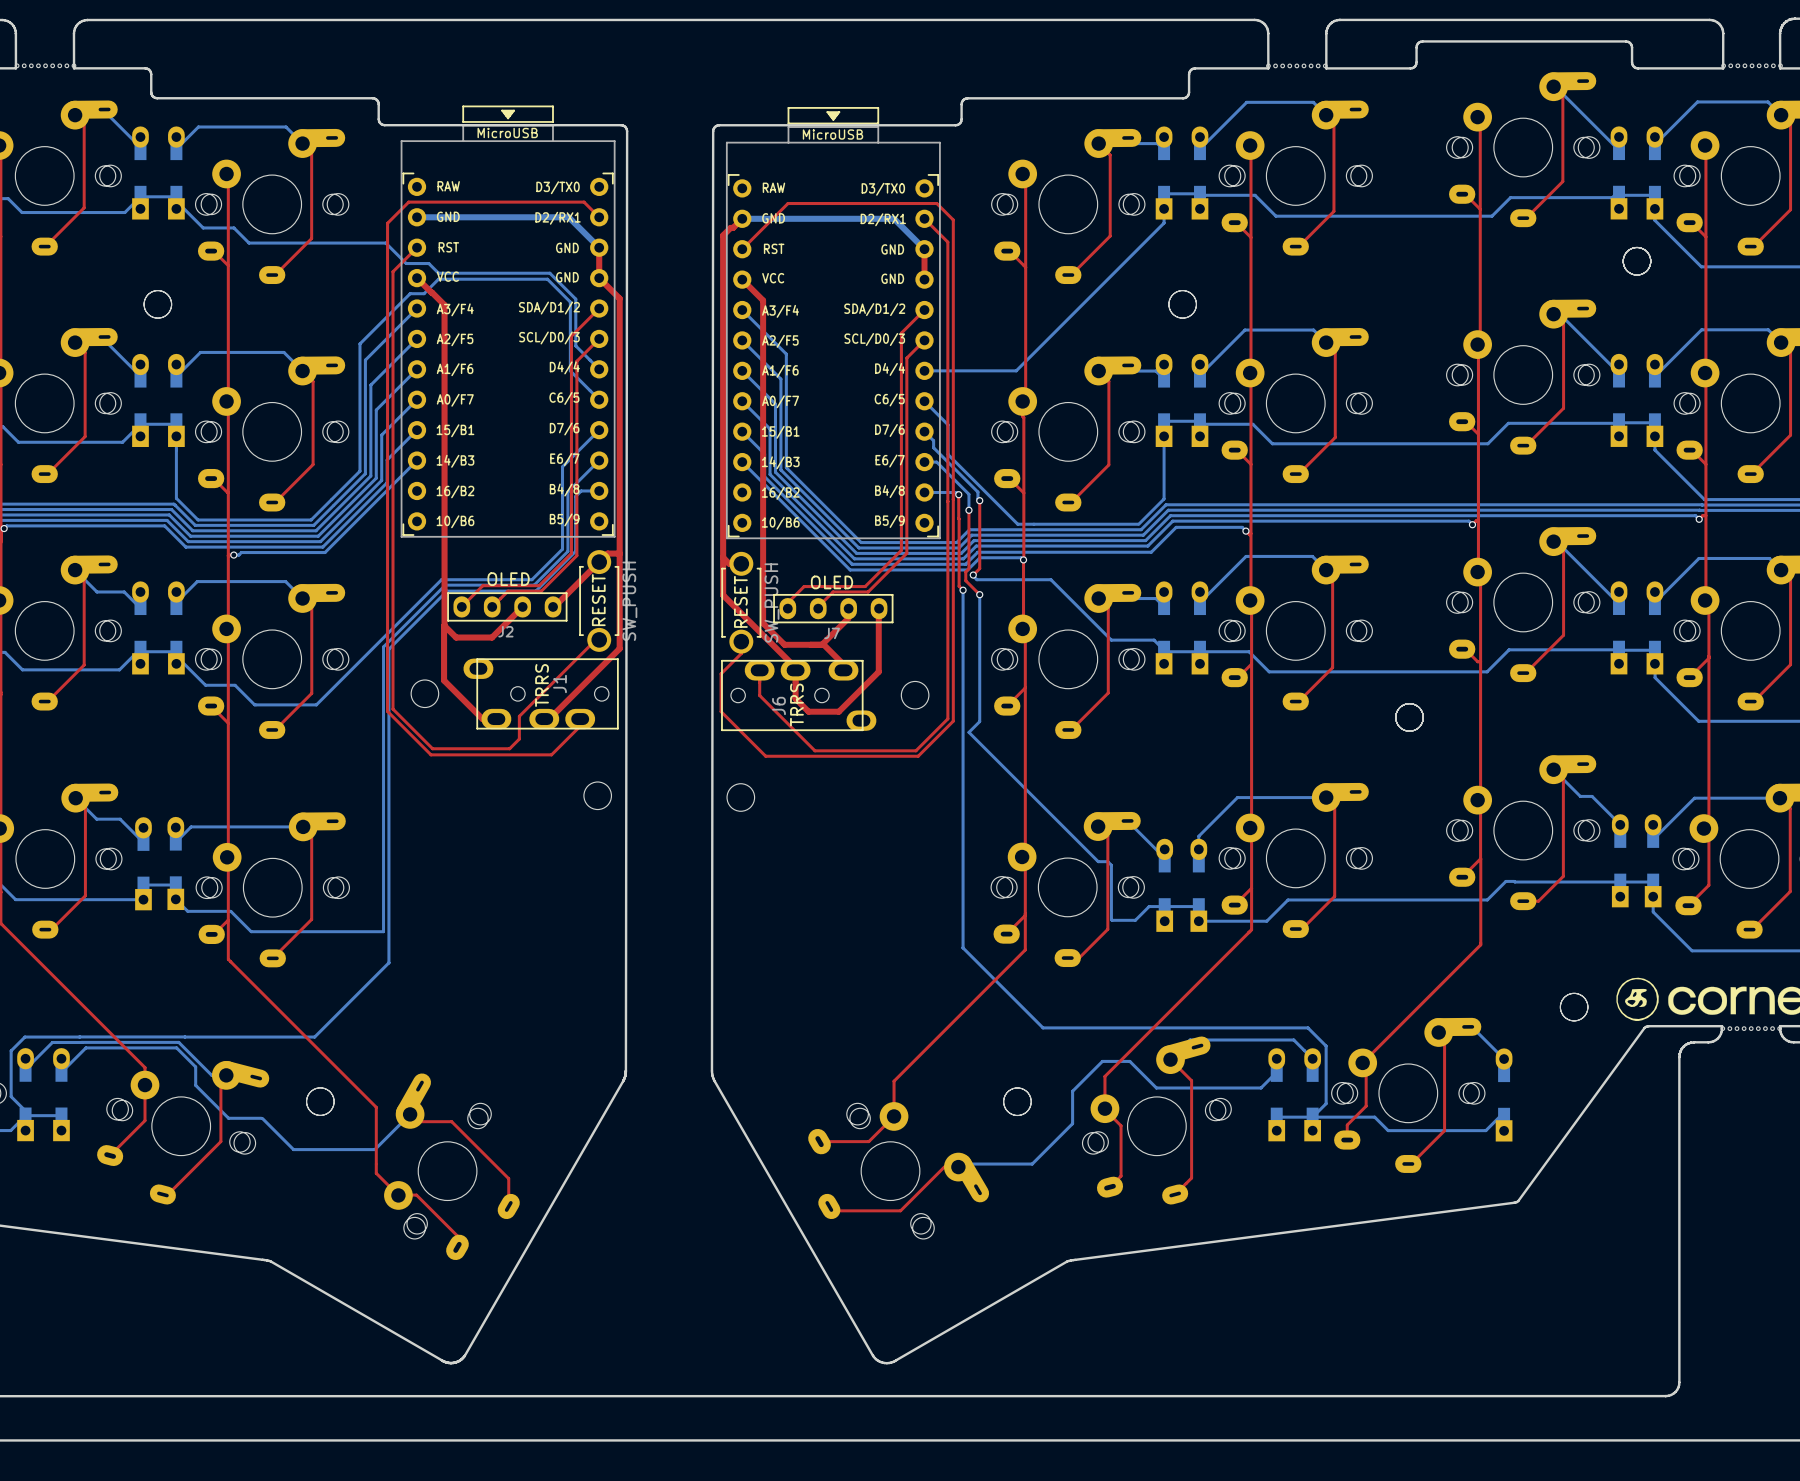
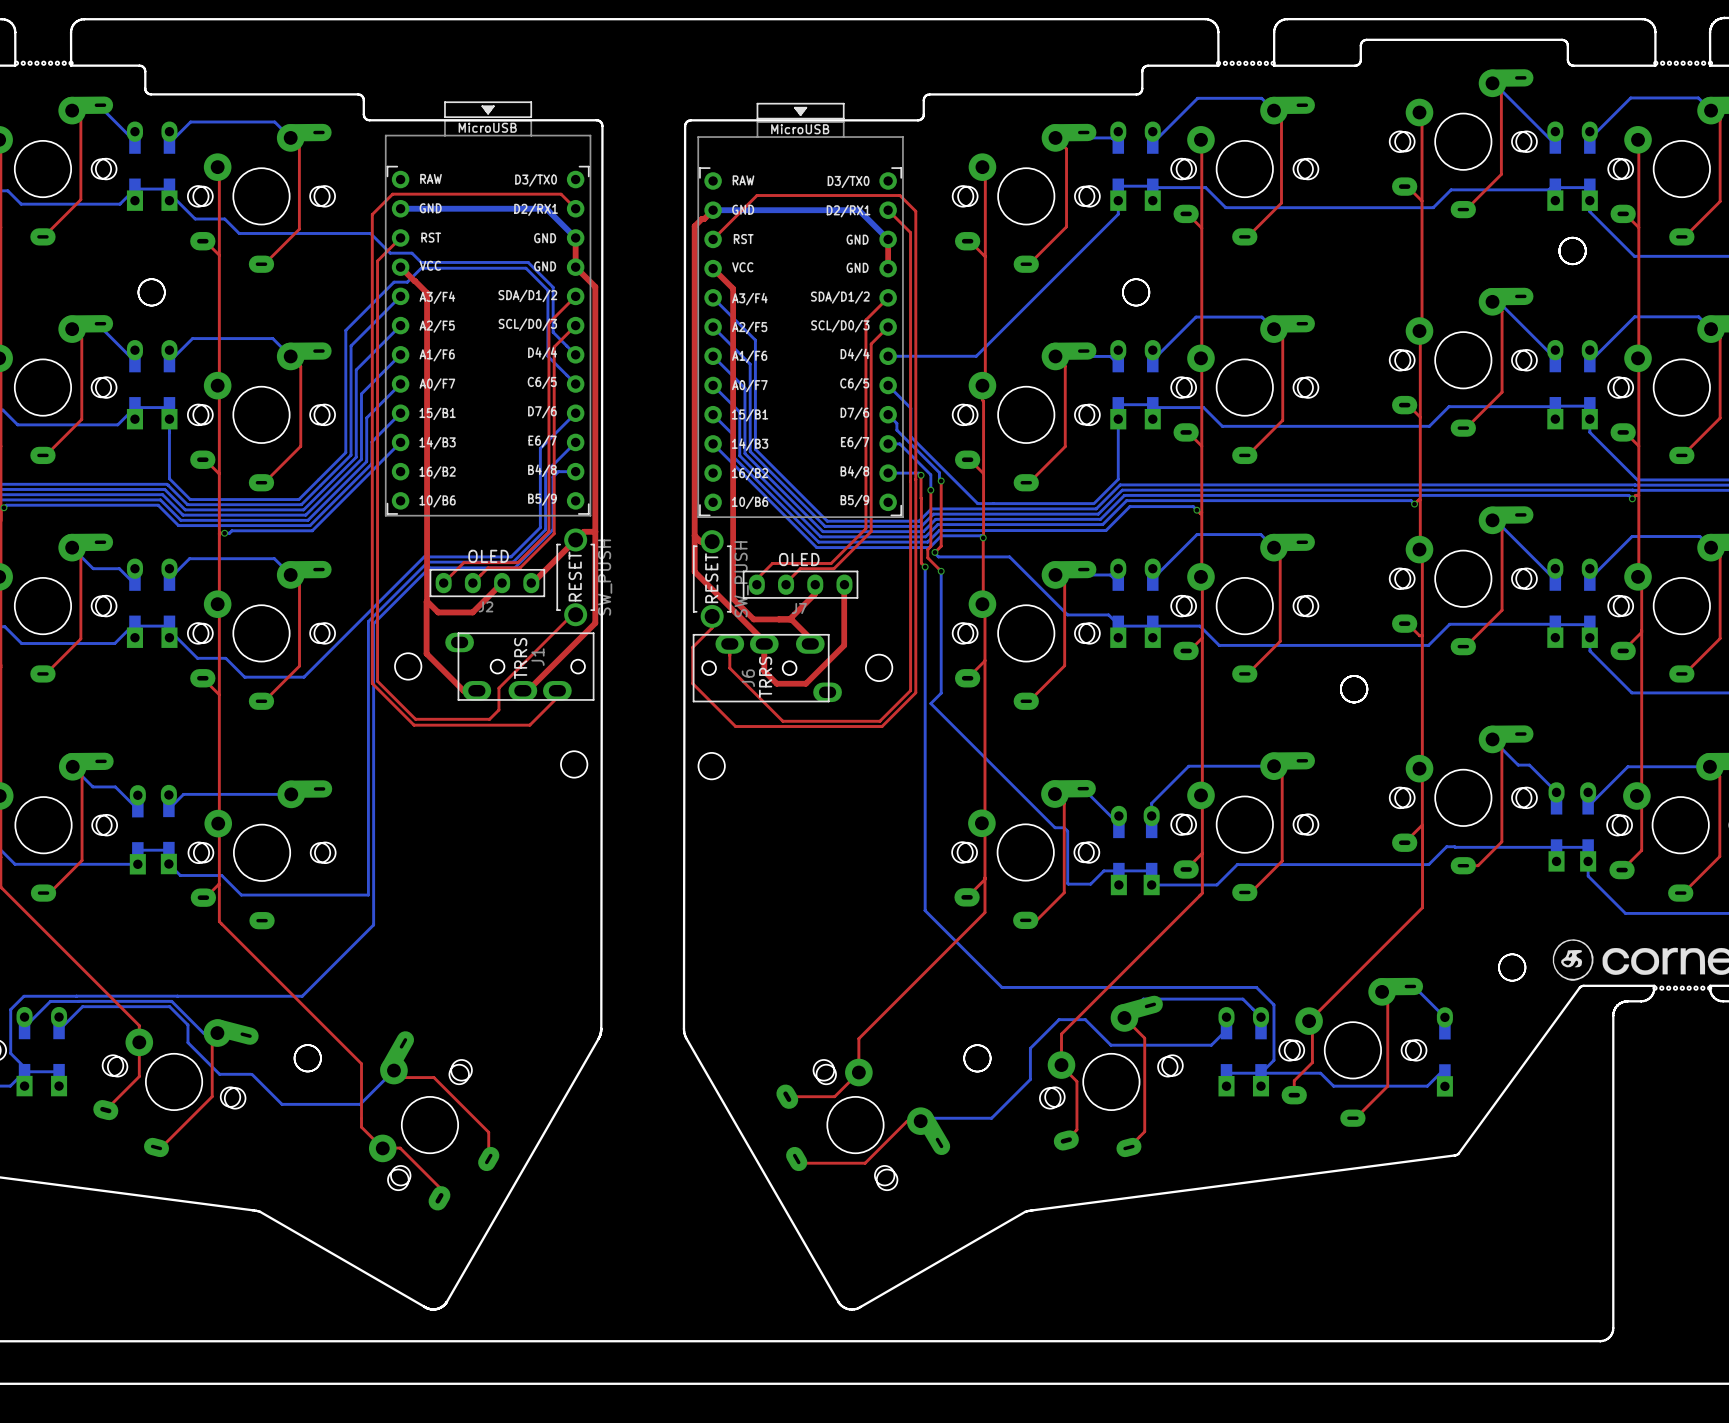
top track: (303, 826) (311, 835) (311, 919) (272, 958) -> none

